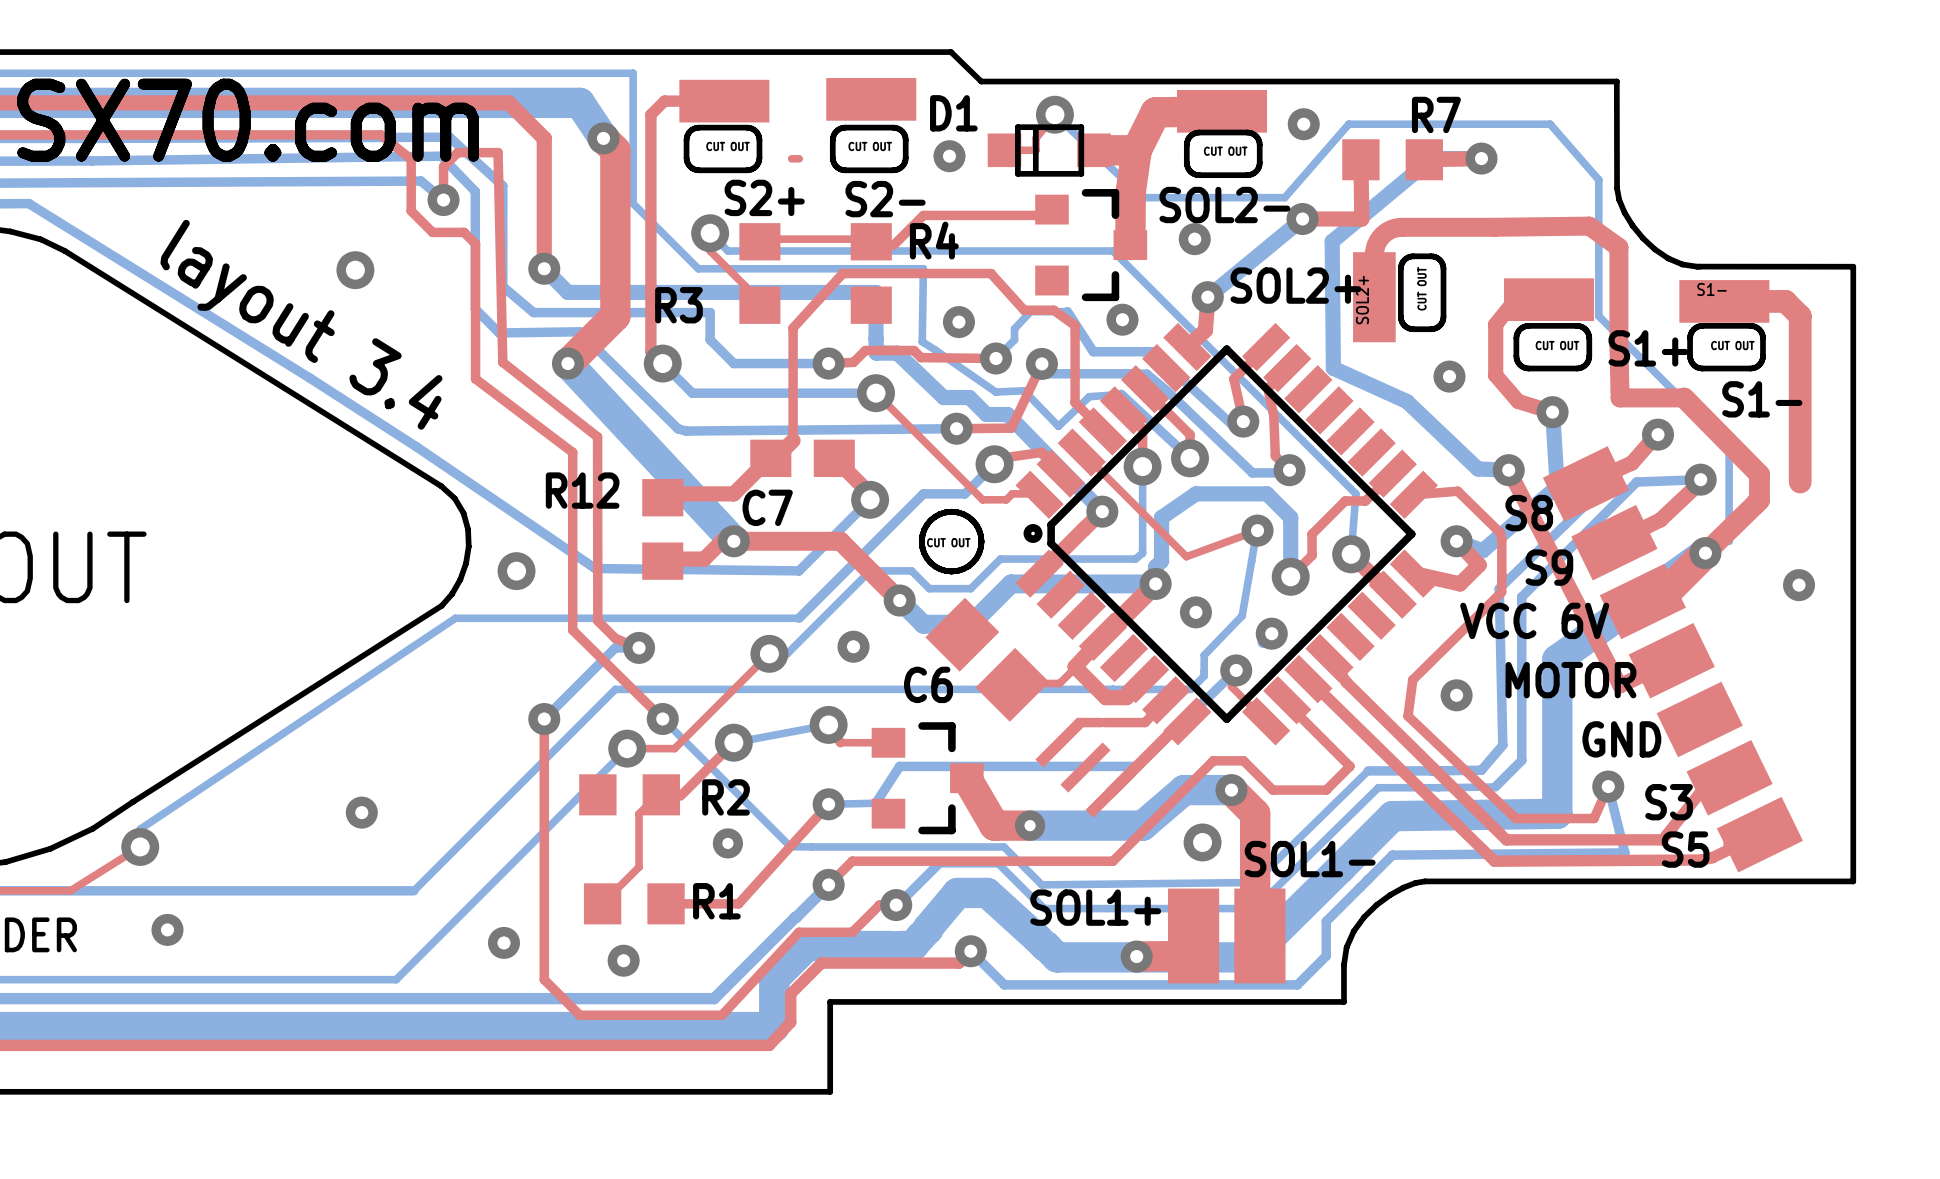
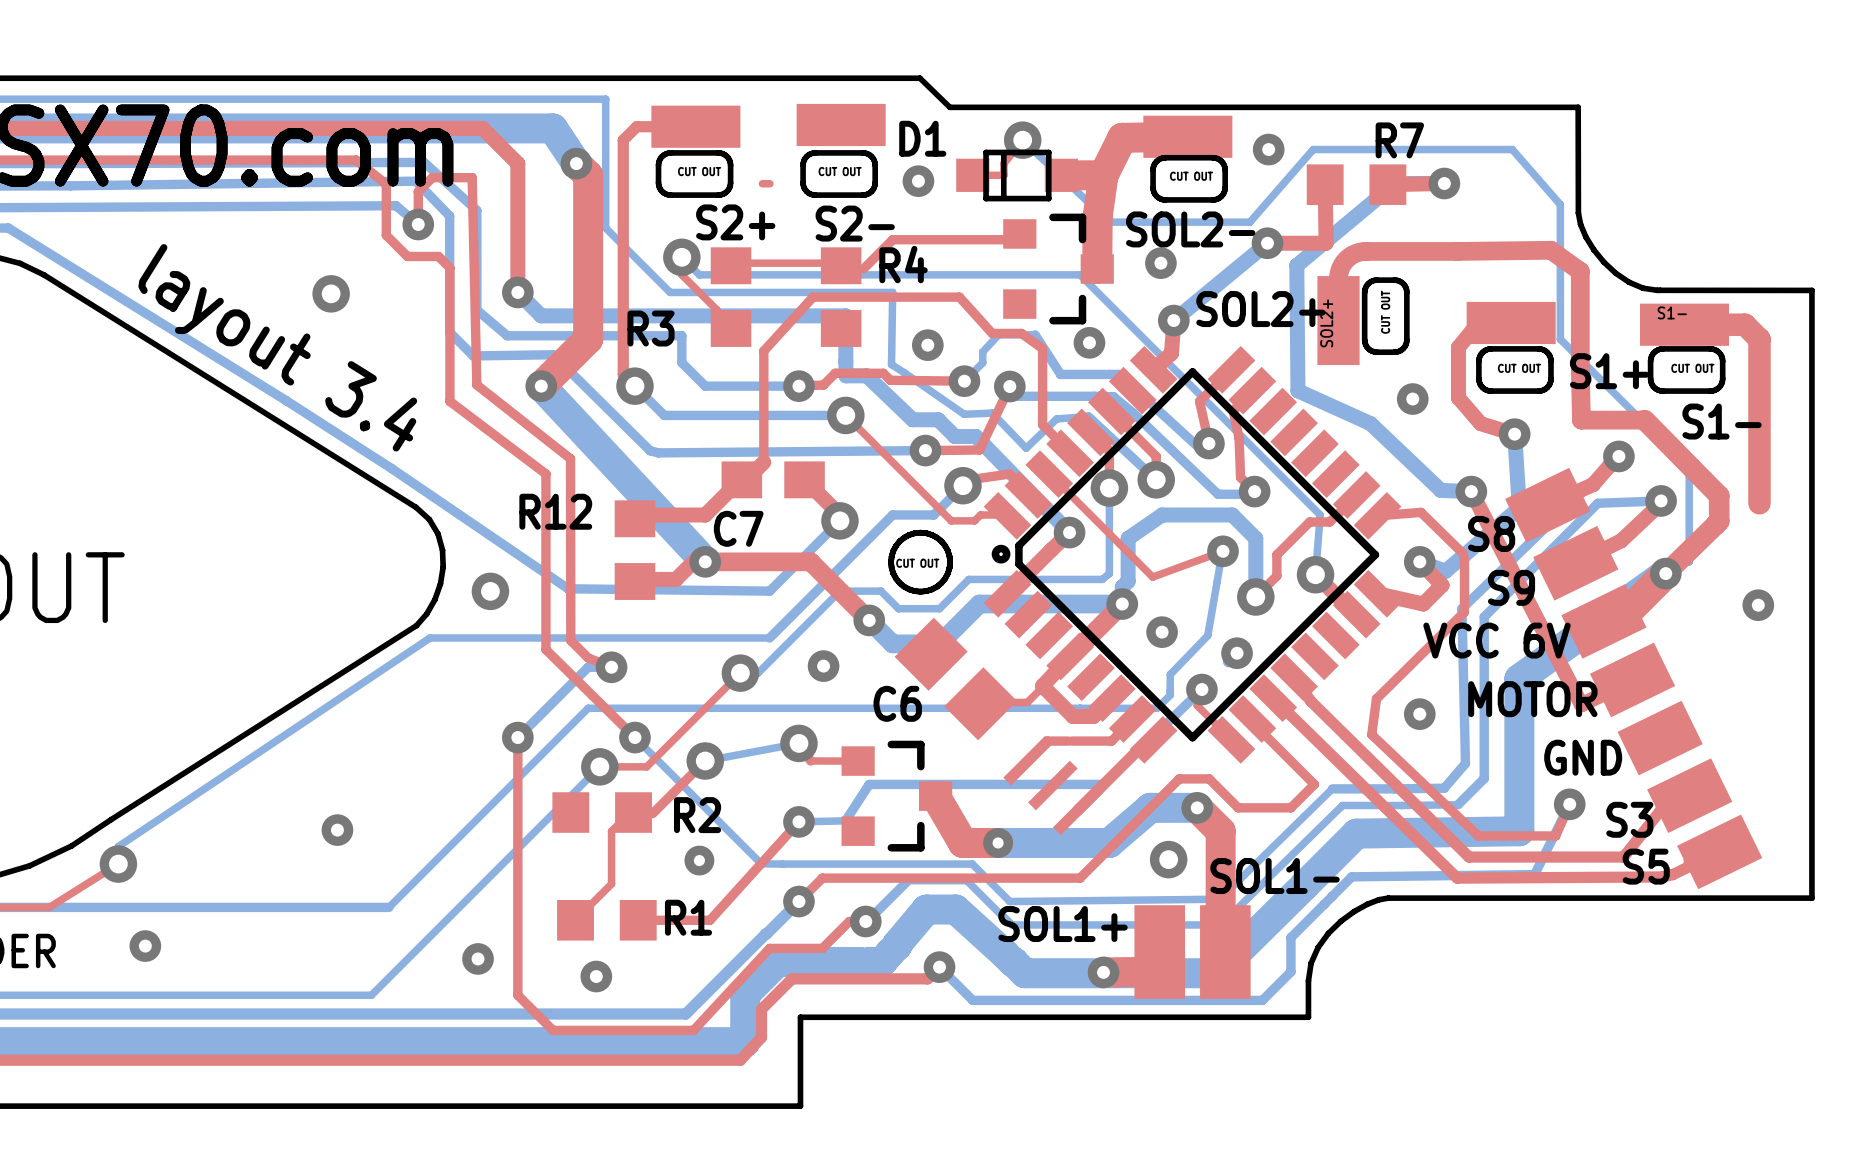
bottom track: (1608, 786) (1624, 852) (1392, 855) (1387, 859) -> (1569, 804) (1534, 874) (1351, 876)

